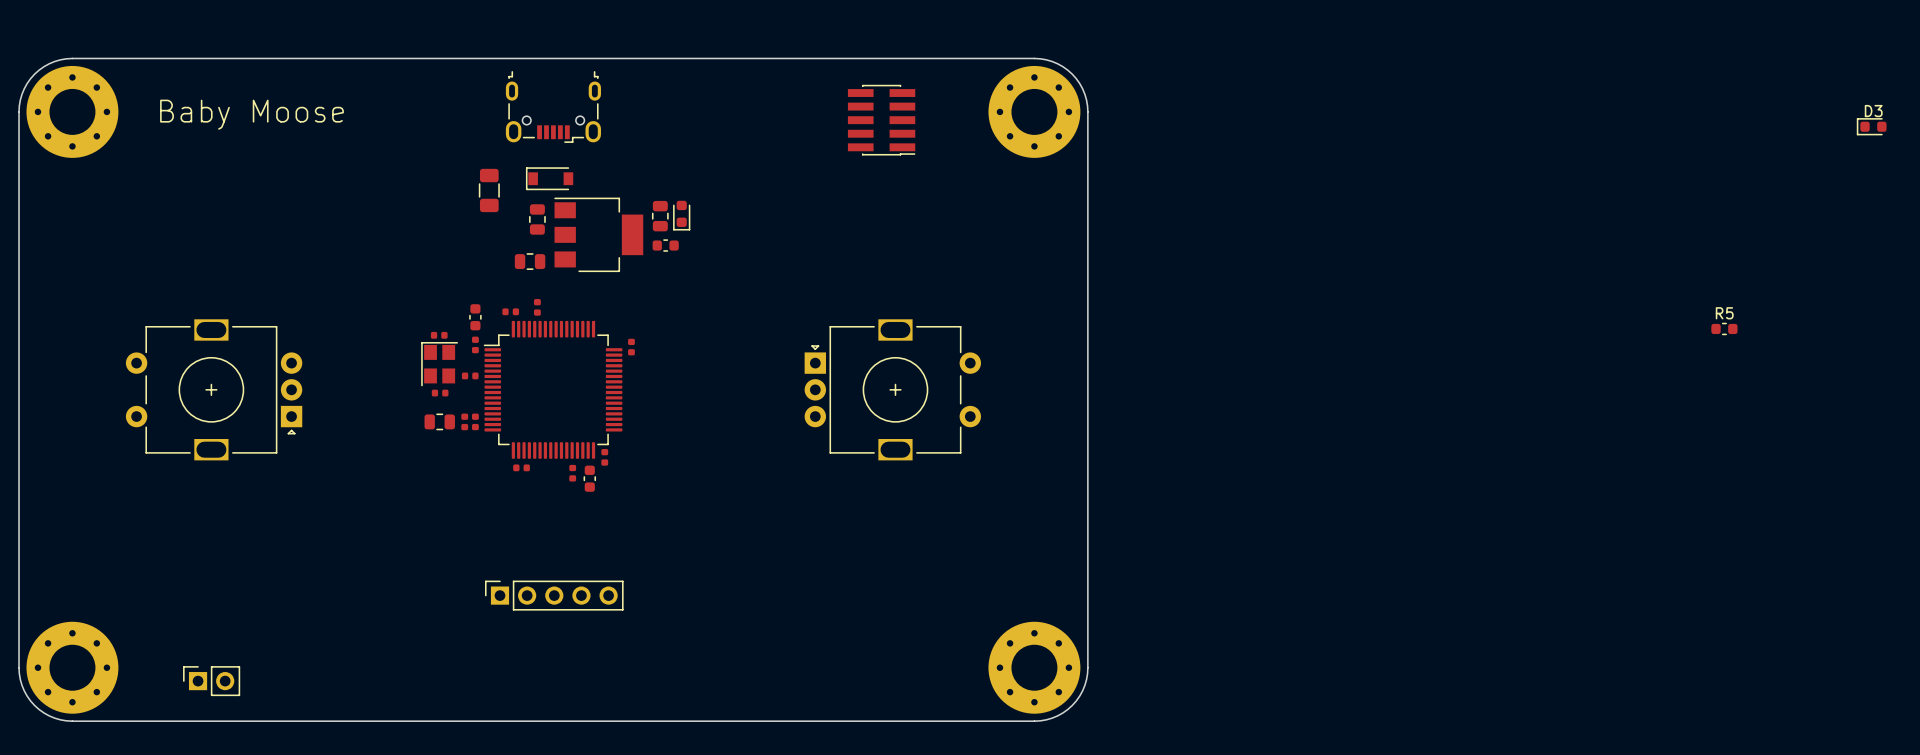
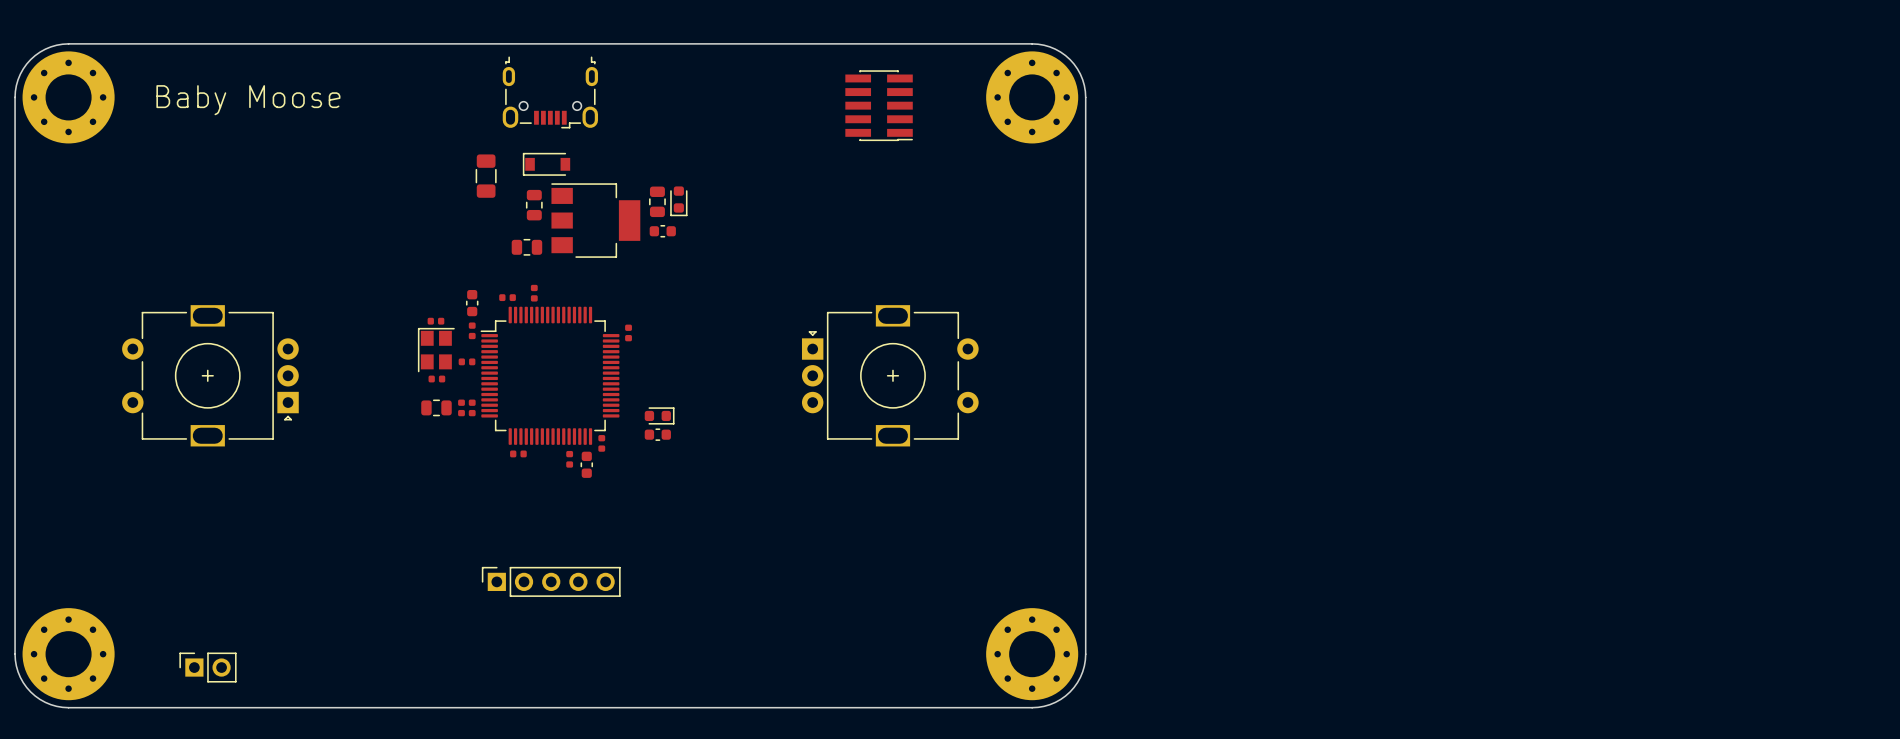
D3: (1871, 126) -> none
R5: (1724, 328) -> none
part: none -> (659, 415)
part: none -> (657, 434)

